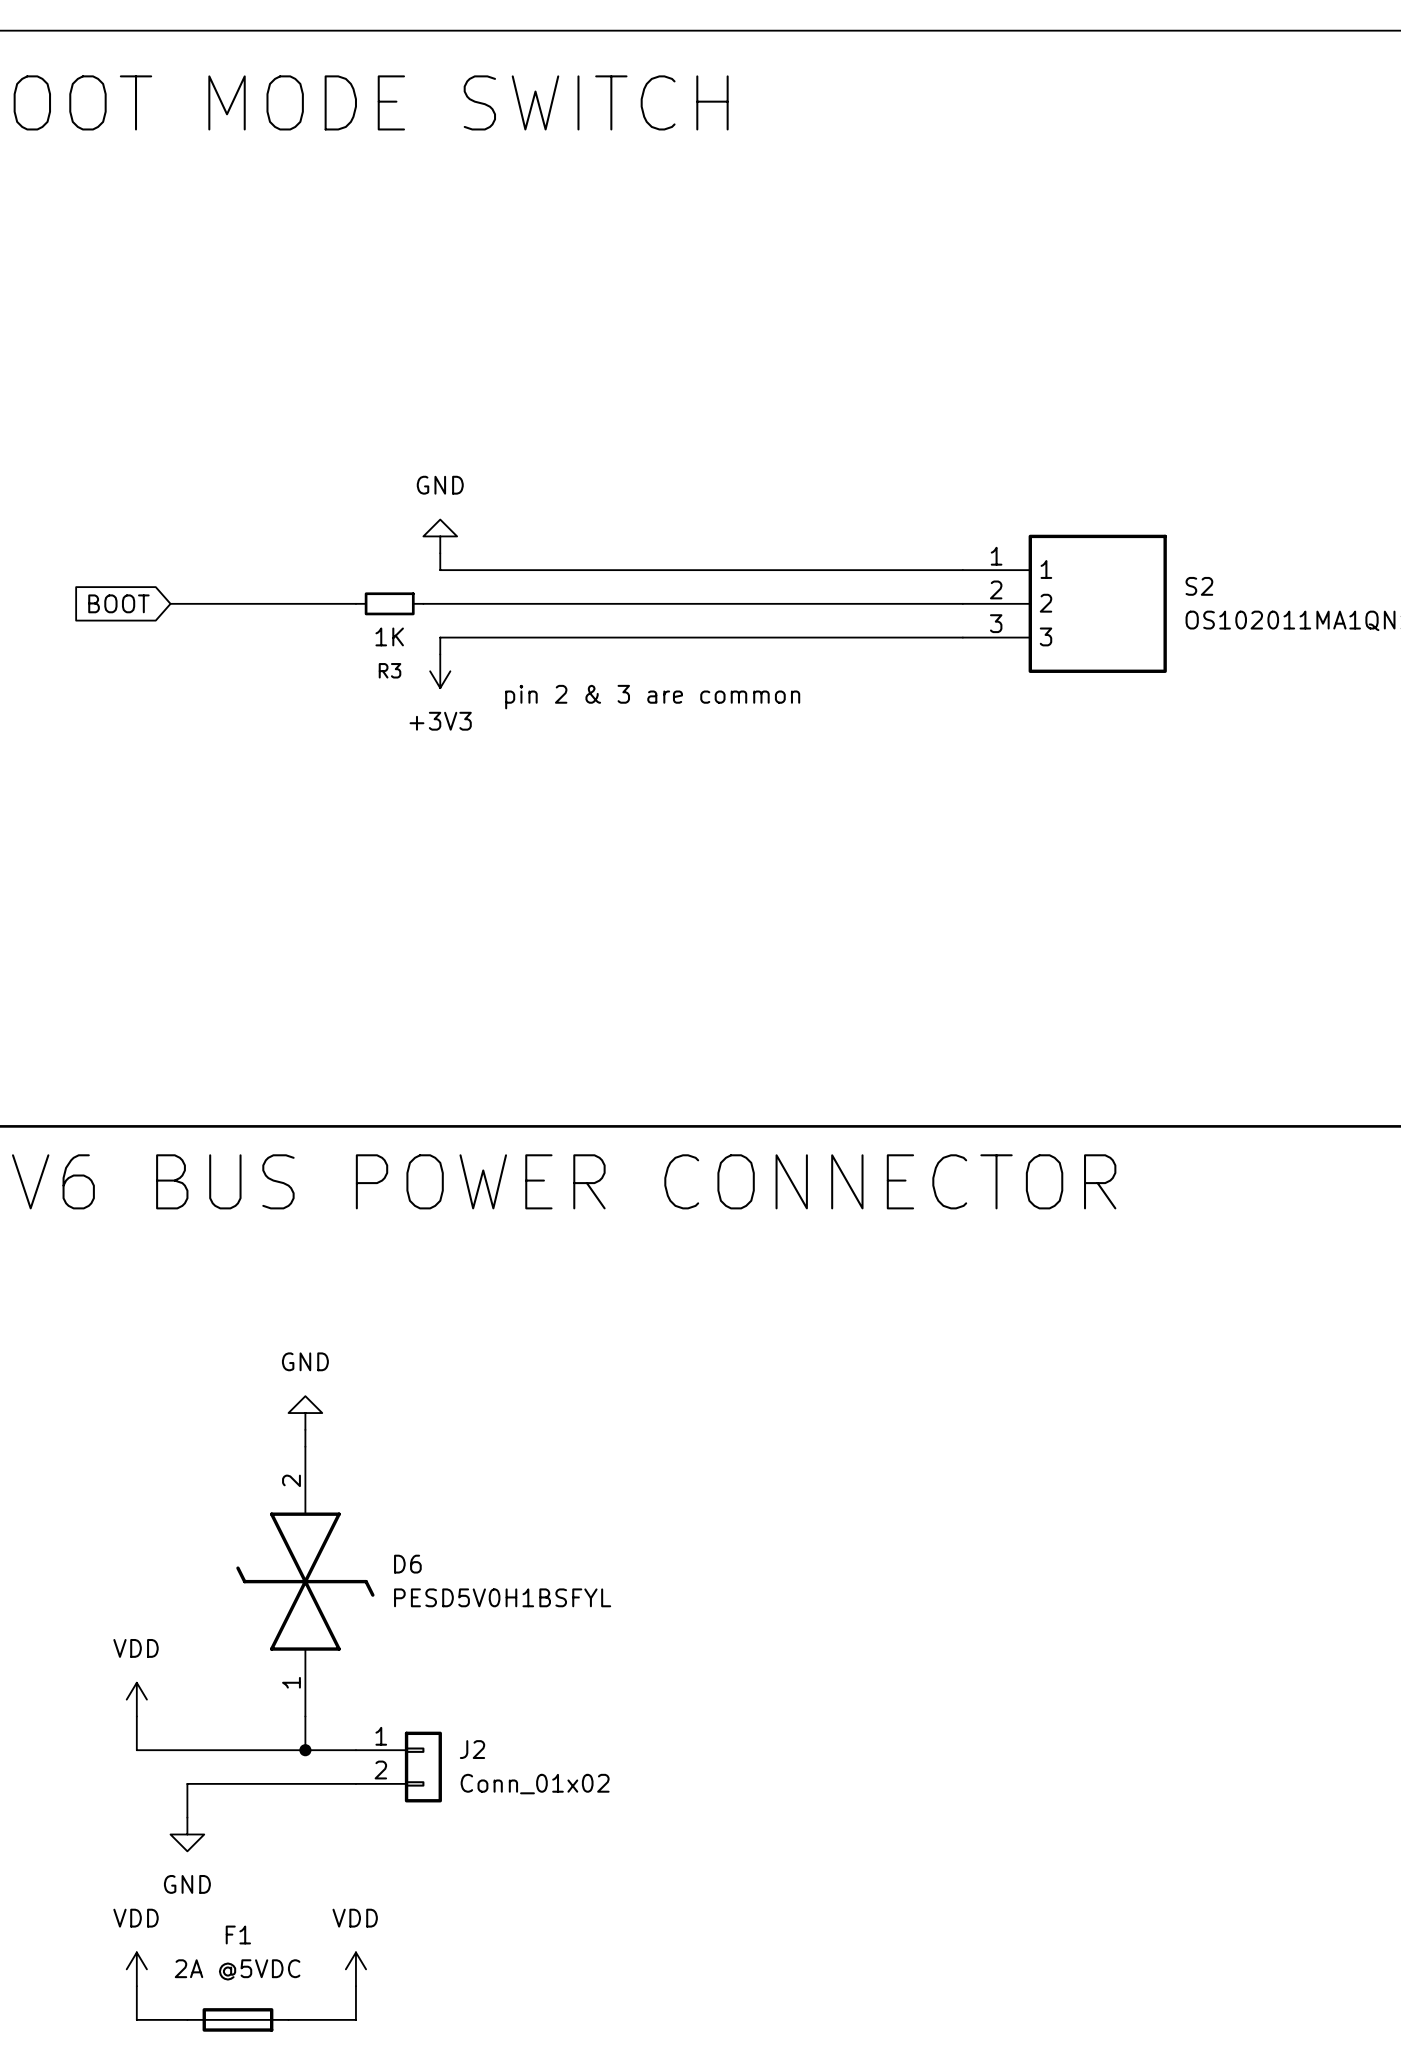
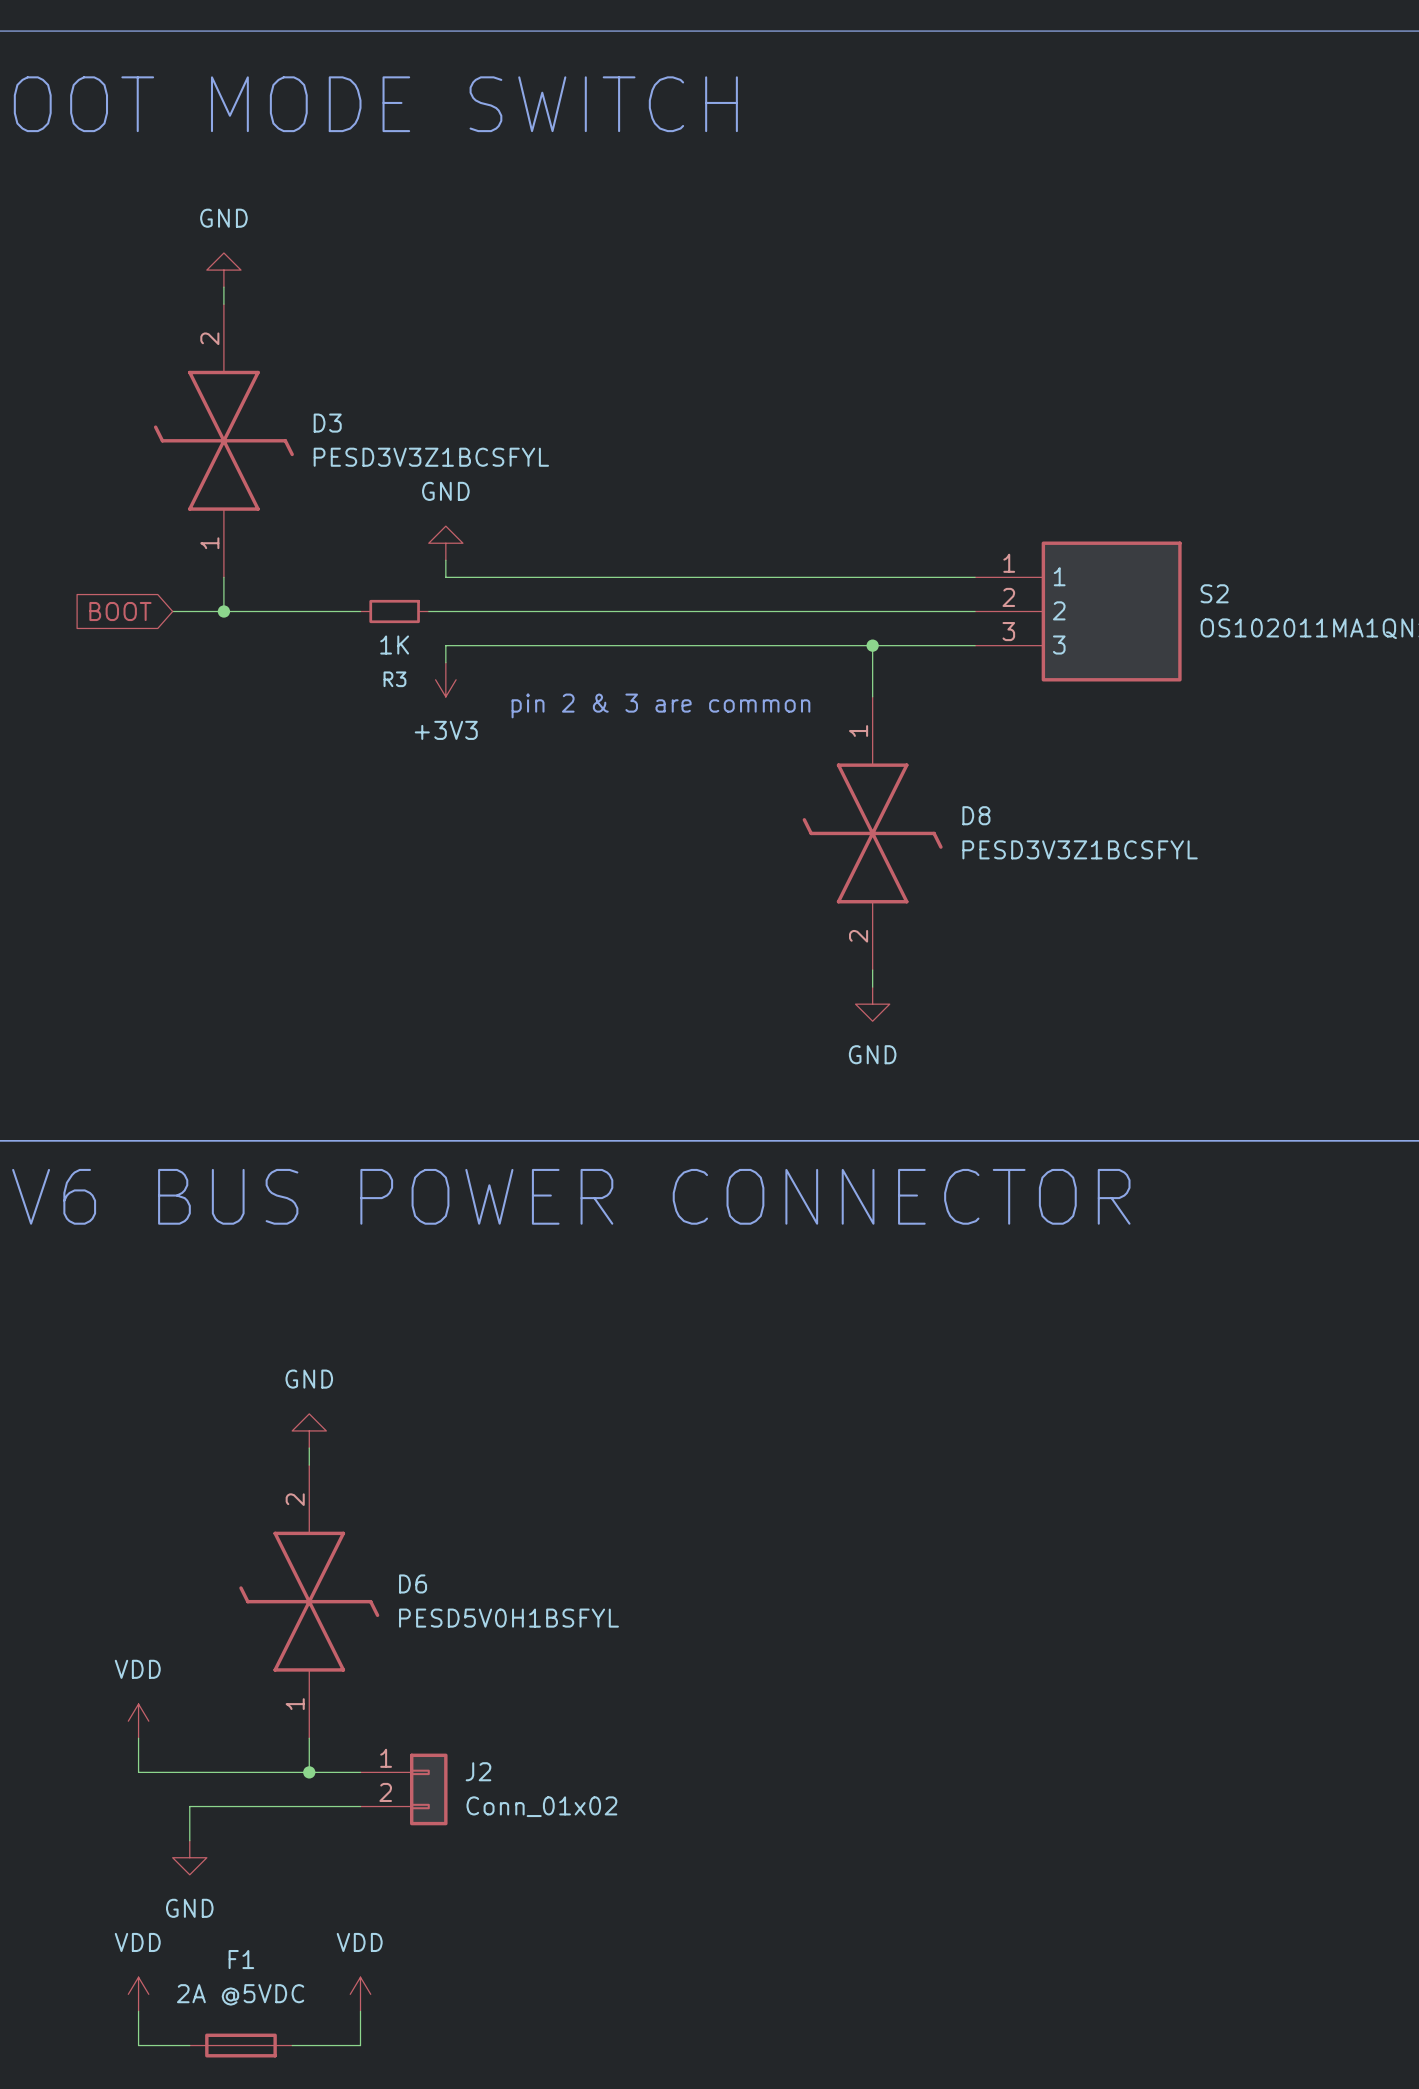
power symbol: none -> GND (223, 270)
wire: none -> (223, 287) (223, 304)
D3: none -> PESD3V3Z1BCSFYL (223, 440)
wire: none -> (223, 577) (223, 611)
junction: none -> (223, 611)
wire: none -> (872, 645) (872, 696)
junction: none -> (872, 645)
D8: none -> PESD3V3Z1BCSFYL (872, 833)
wire: none -> (872, 970) (872, 987)
power symbol: none -> GND (872, 1004)

